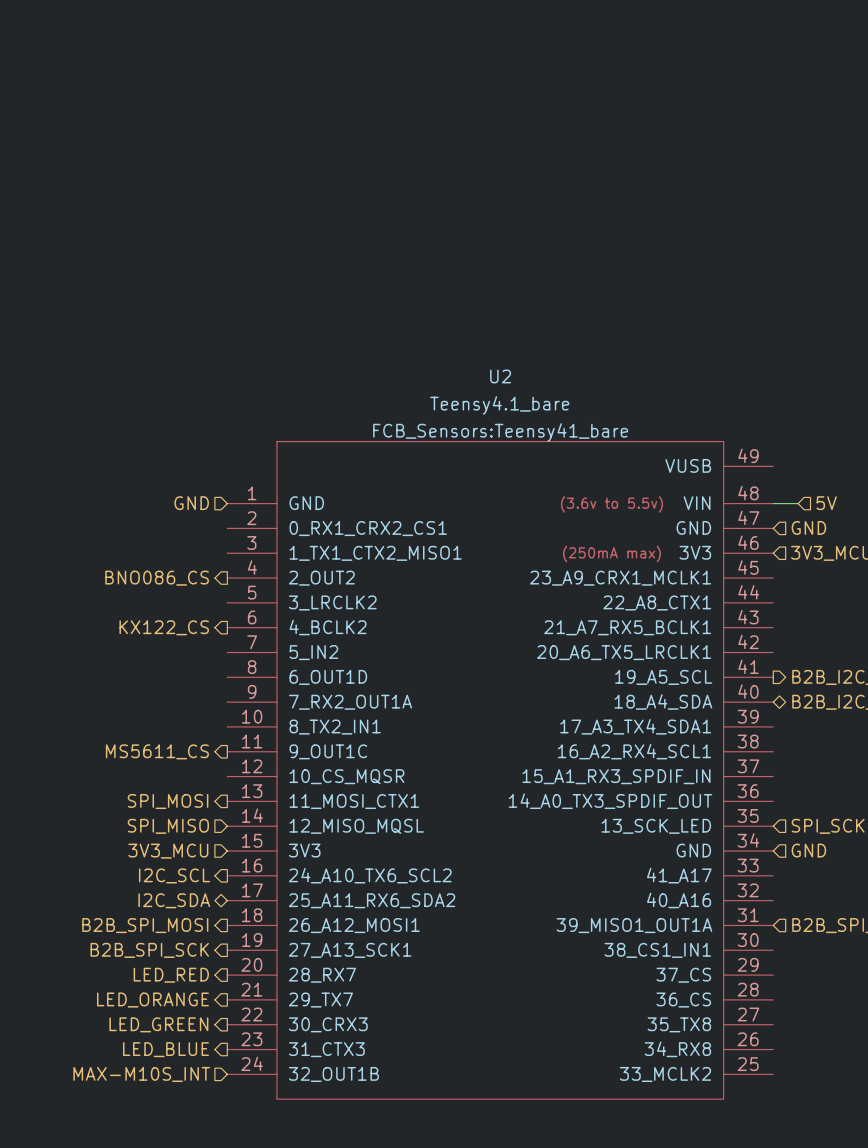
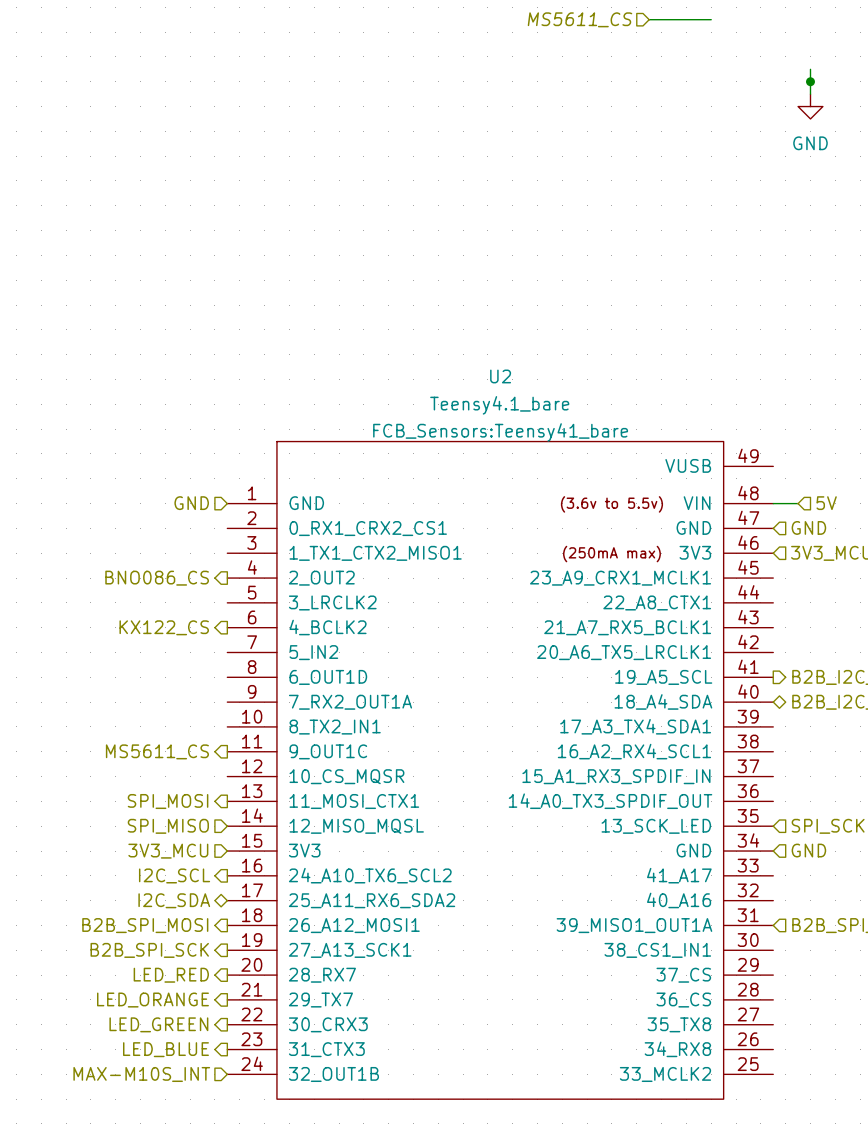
hierarchical label: none -> MS5611_CS (580, 19)
wire: none -> (649, 19) (711, 19)
wire: none -> (810, 69) (810, 94)
junction: none -> (810, 81)
power symbol: none -> GND (810, 106)

